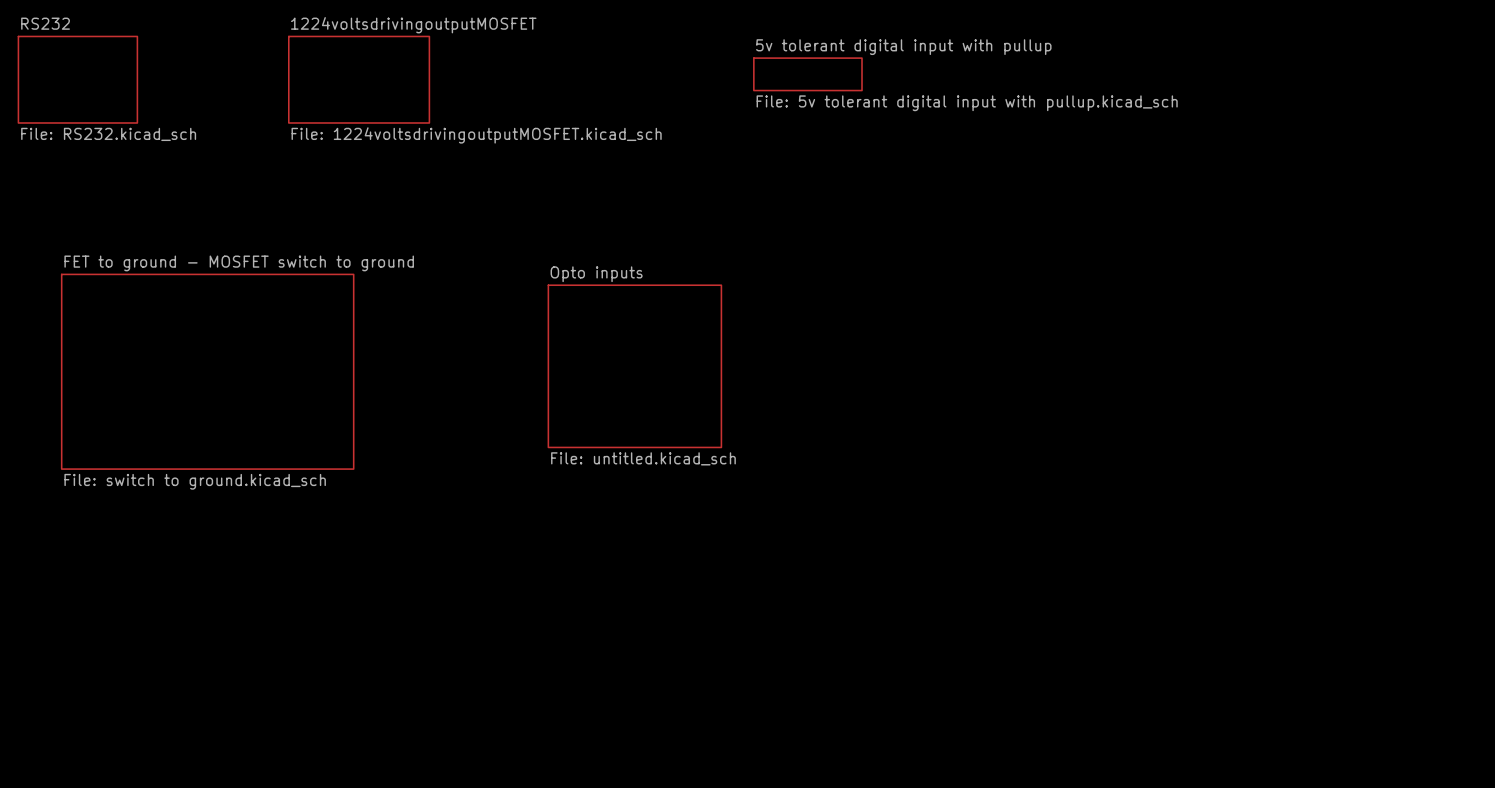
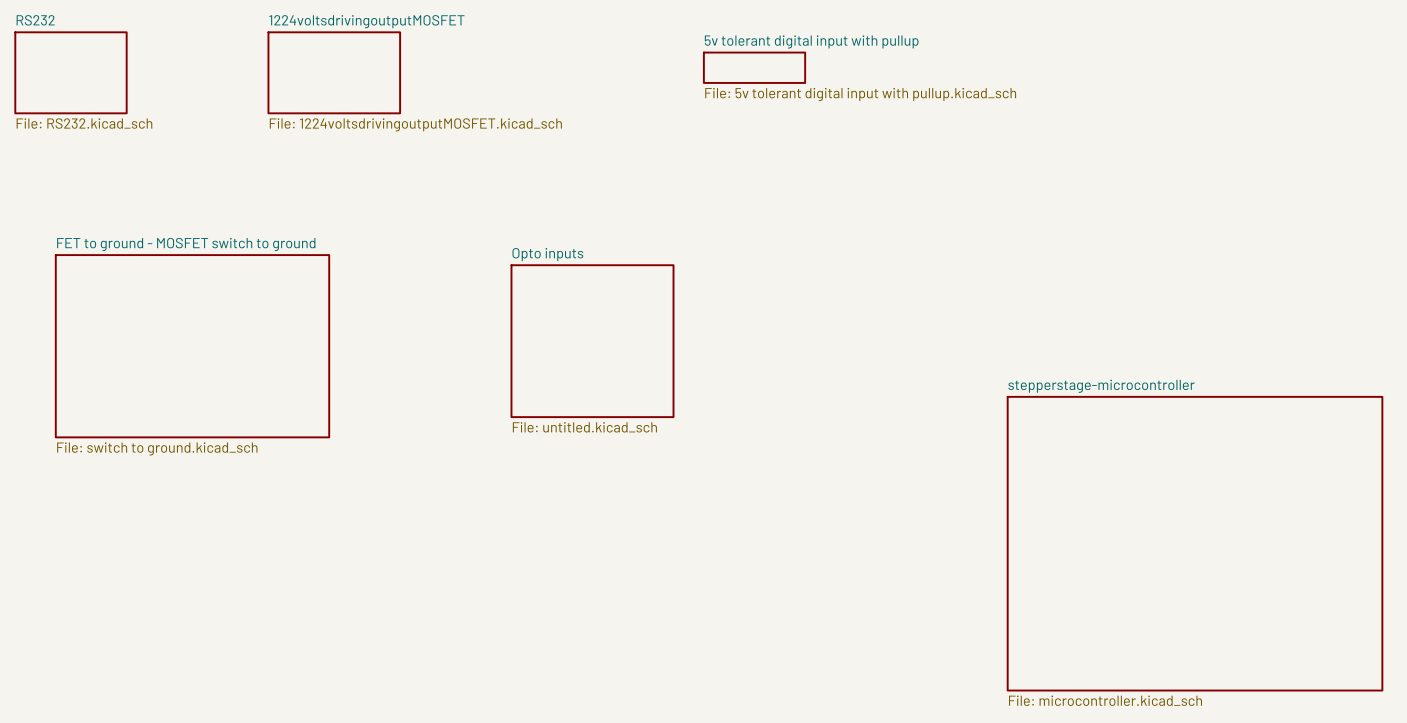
sheet stepperstage-microcontroller: none -> File: microcontroller.kicad_sch (1195, 543)

